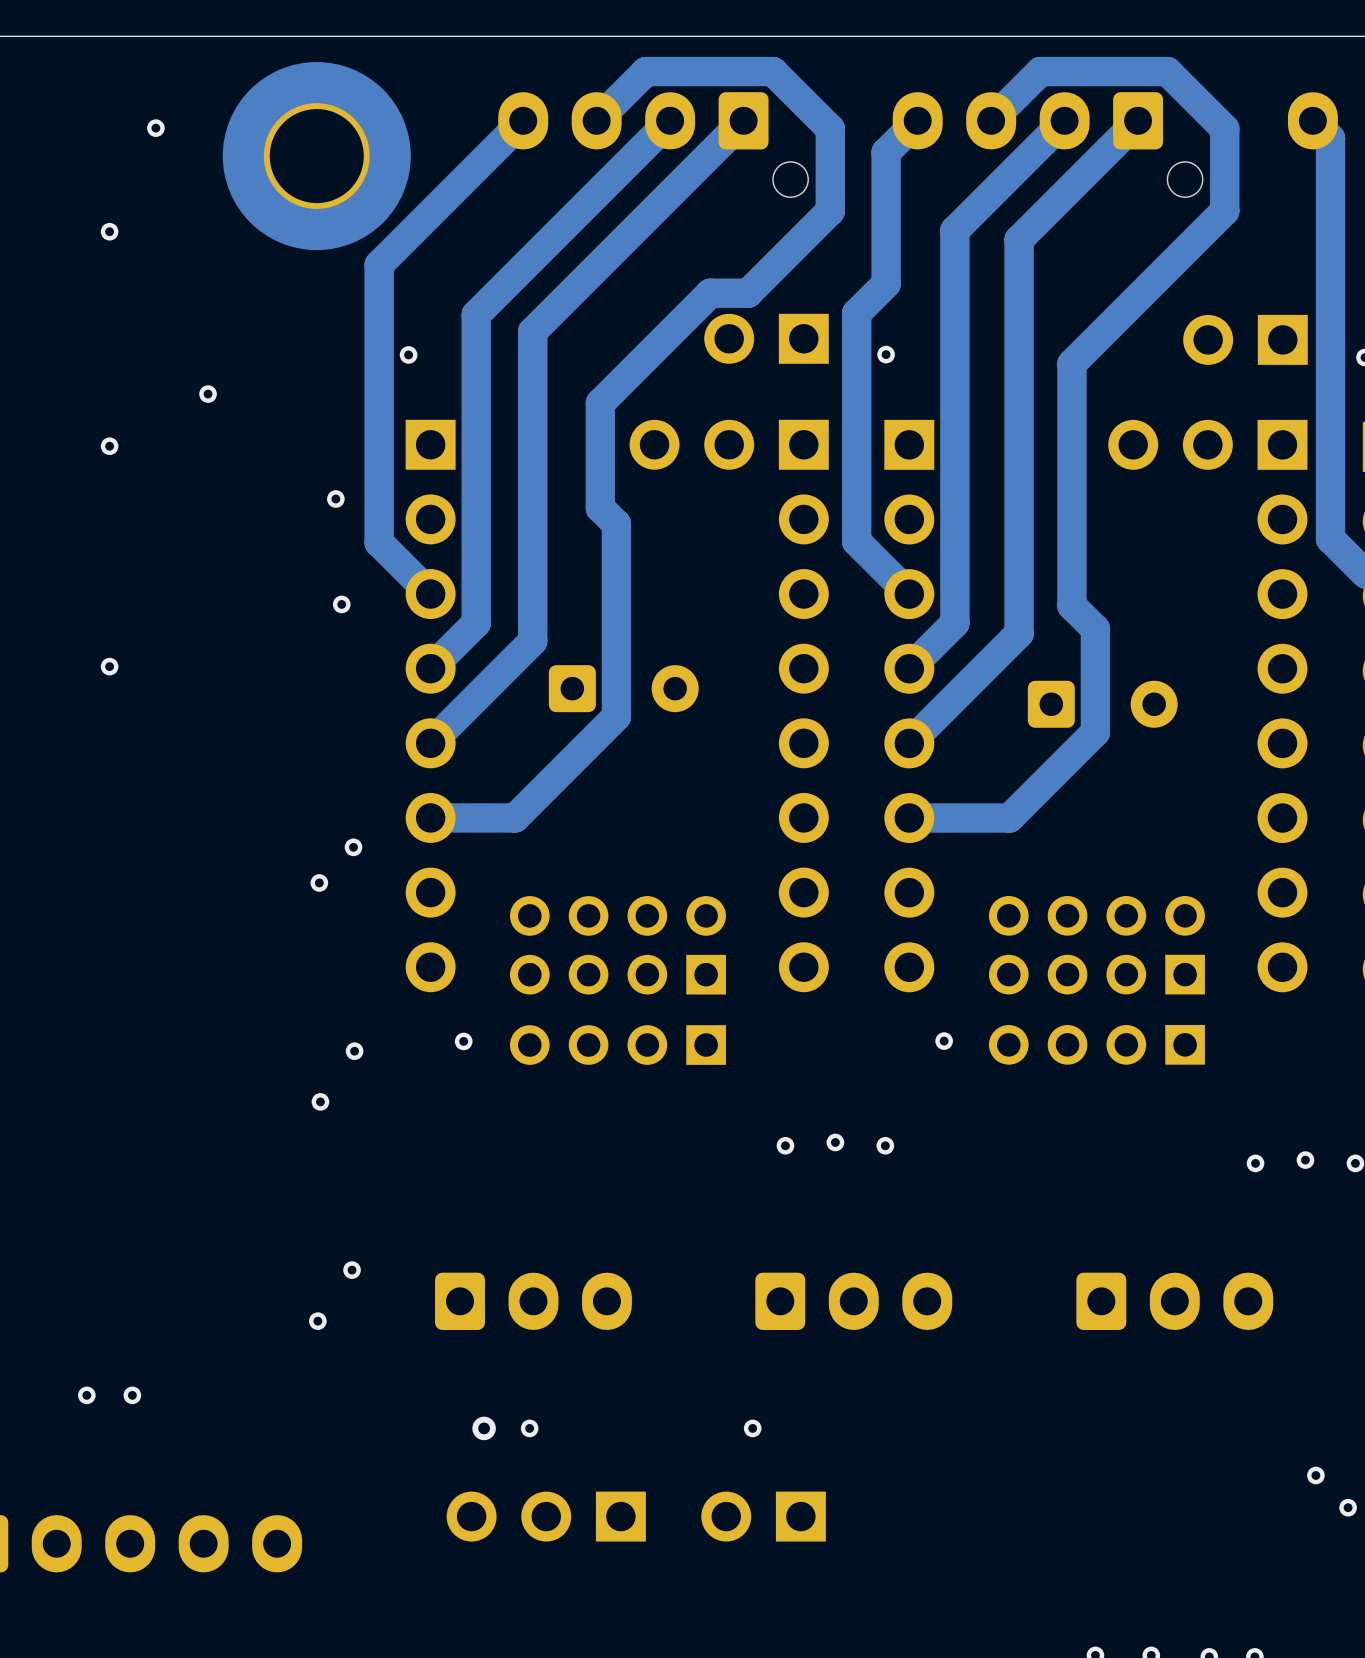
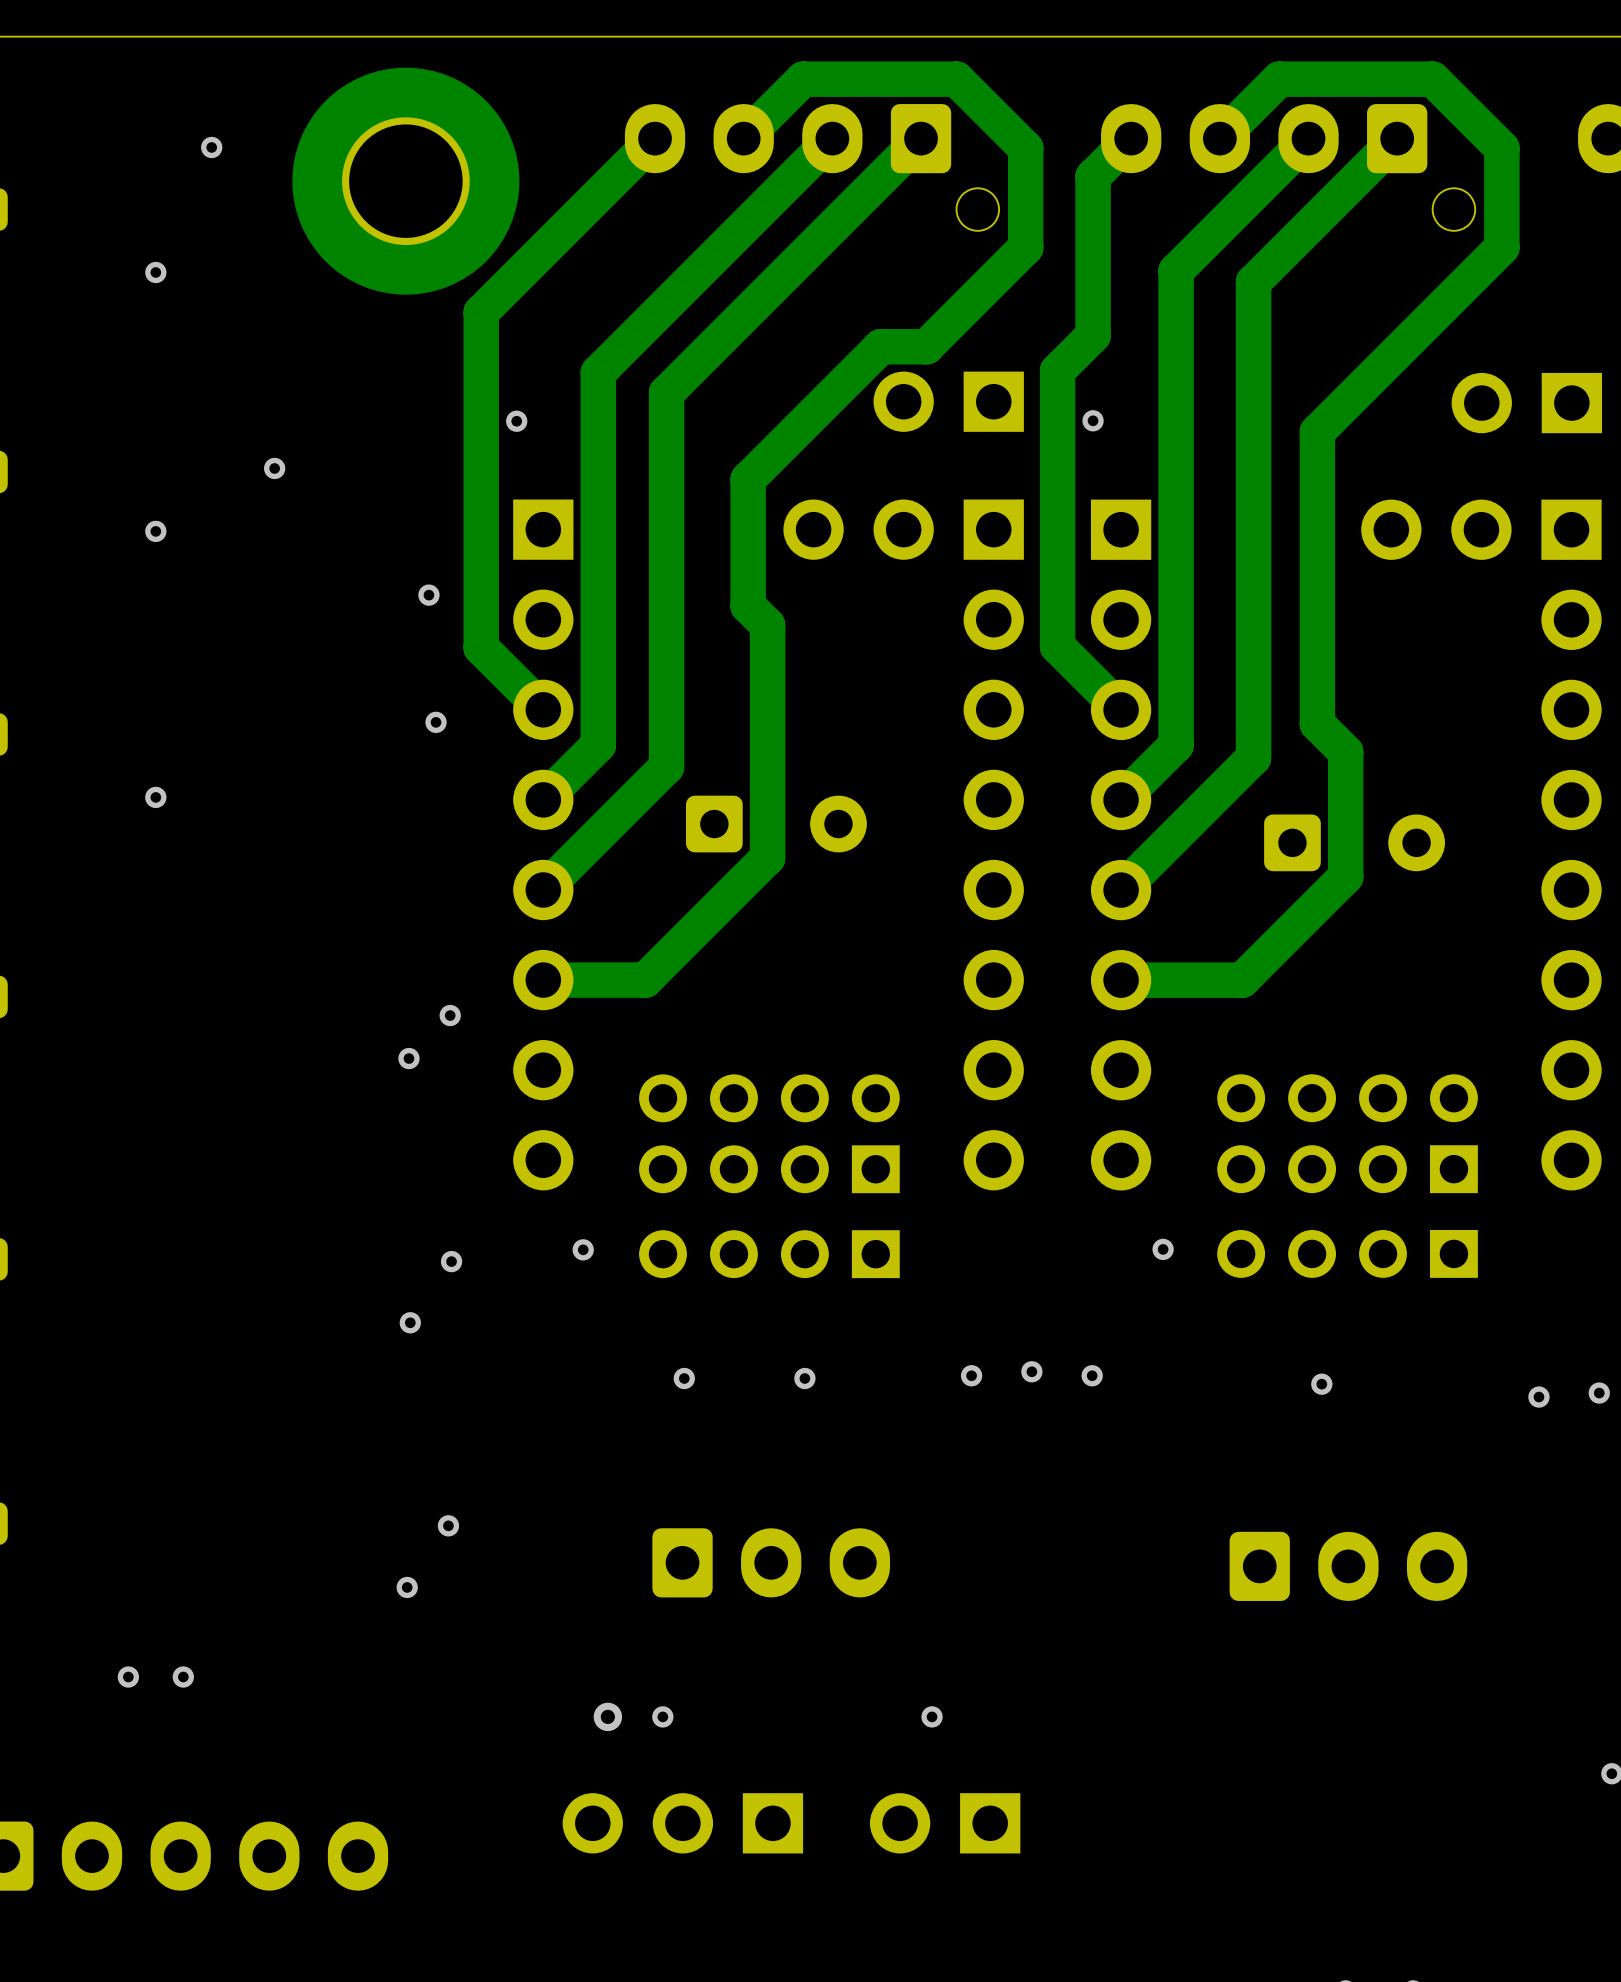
via: none -> (684, 1378)
via: none -> (804, 1378)
via: none -> (1321, 1384)
part position: (533, 1301) -> (771, 1562)
part: (853, 1301) -> none
part position: (1174, 1301) -> (1348, 1566)

